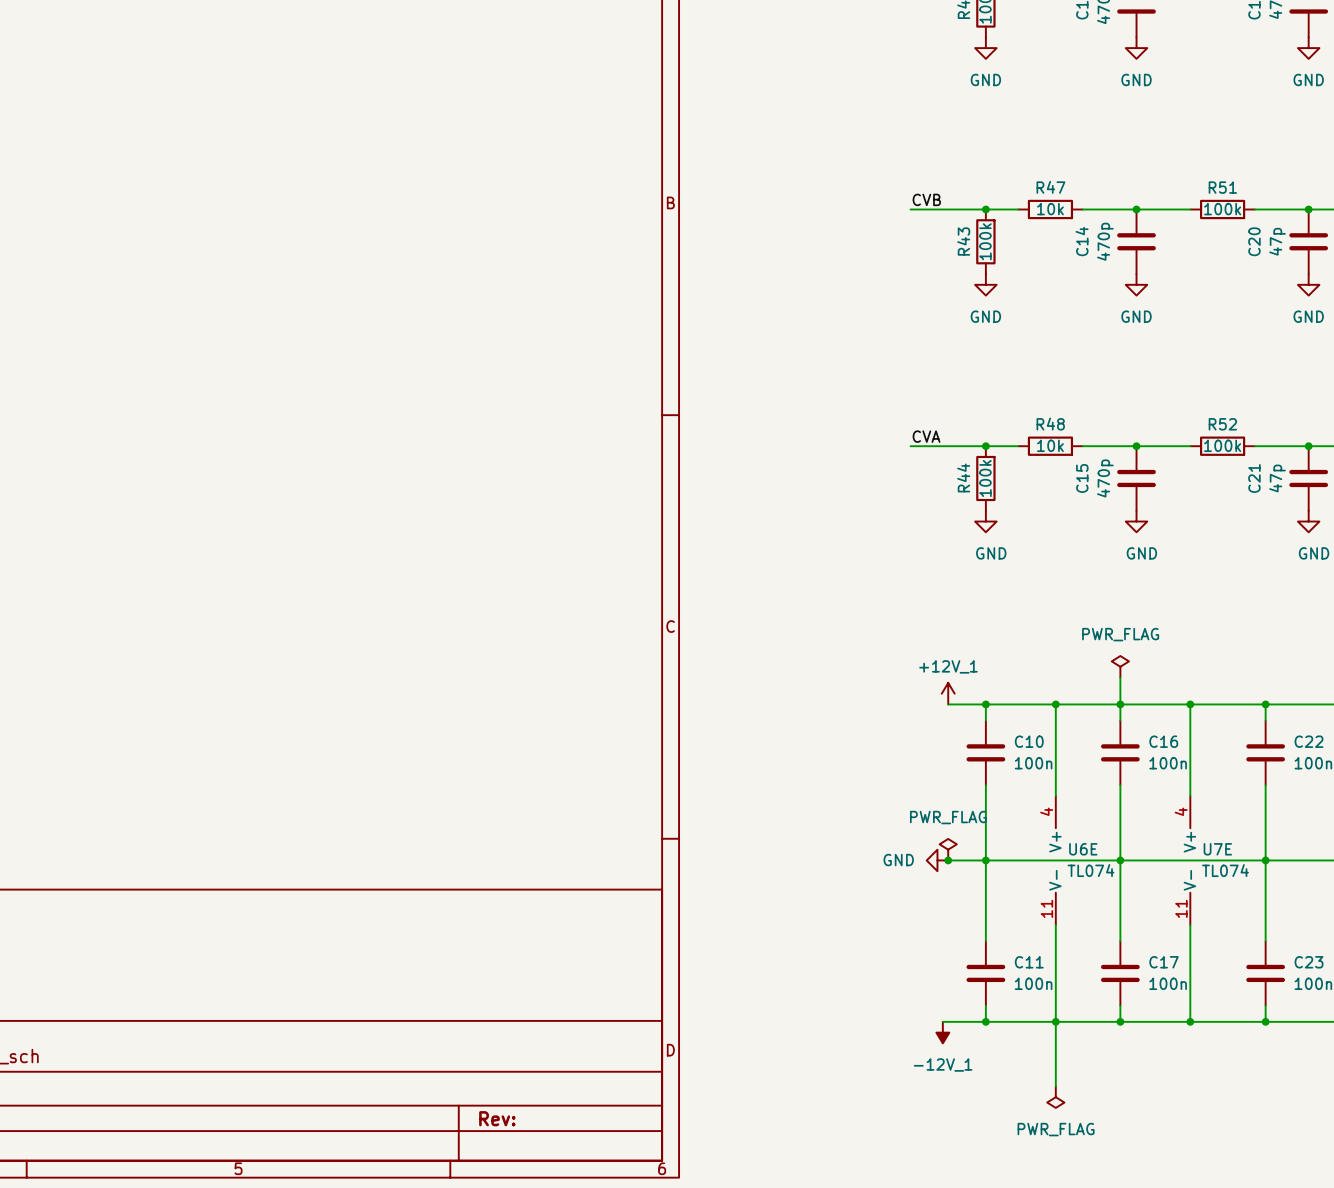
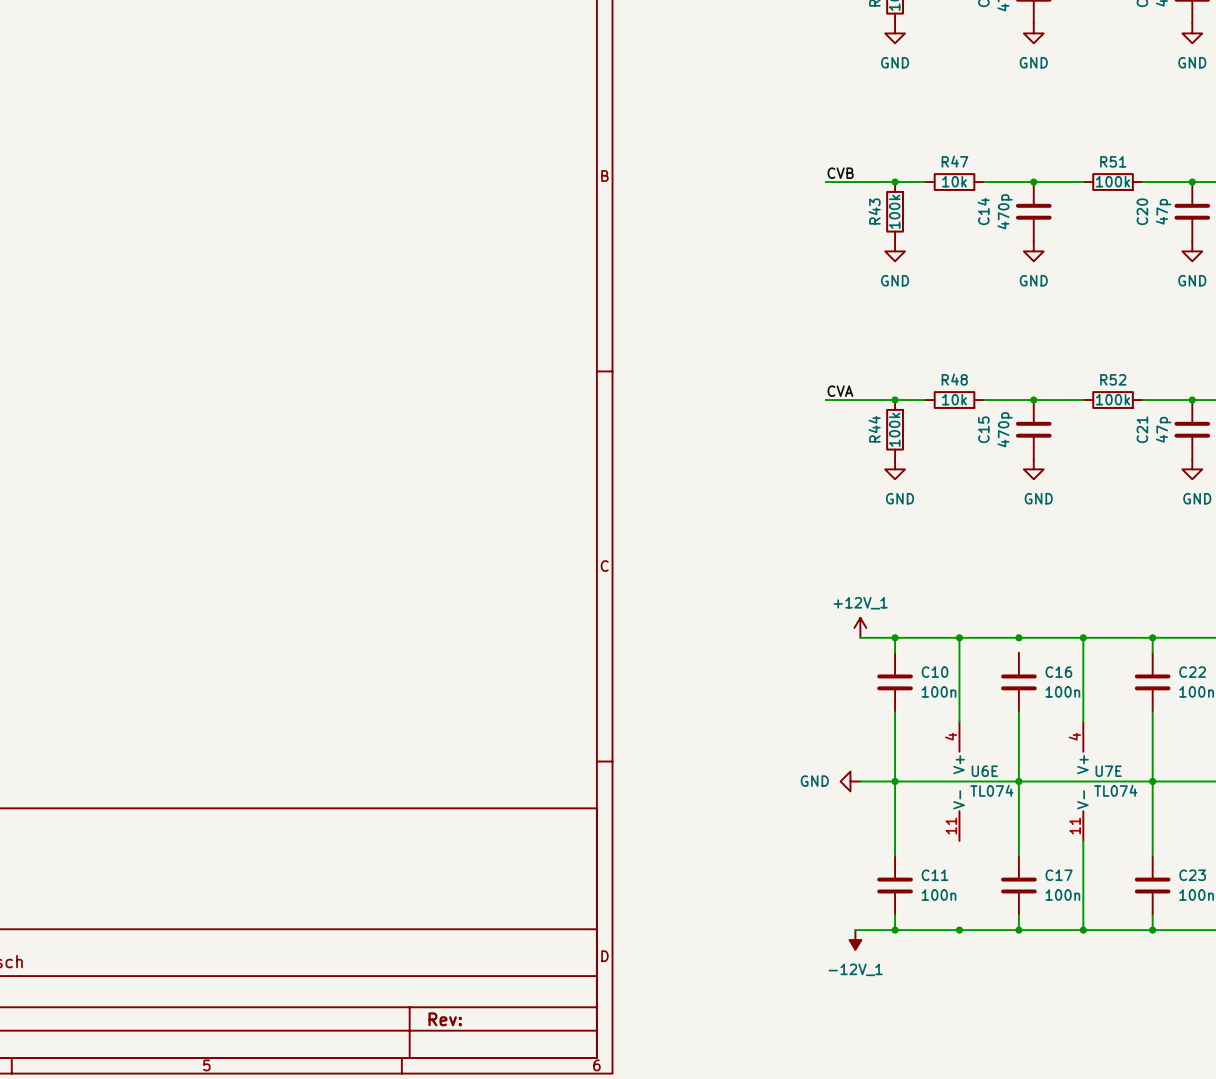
power symbol: PWR_FLAG (1120, 666) -> none
wire: (1120, 677) (1120, 720) -> none
power symbol: PWR_FLAG (948, 849) -> none
junction: (948, 860) -> none
wire: (1055, 925) (1055, 1086) -> none
power symbol: PWR_FLAG (1055, 1097) -> none

